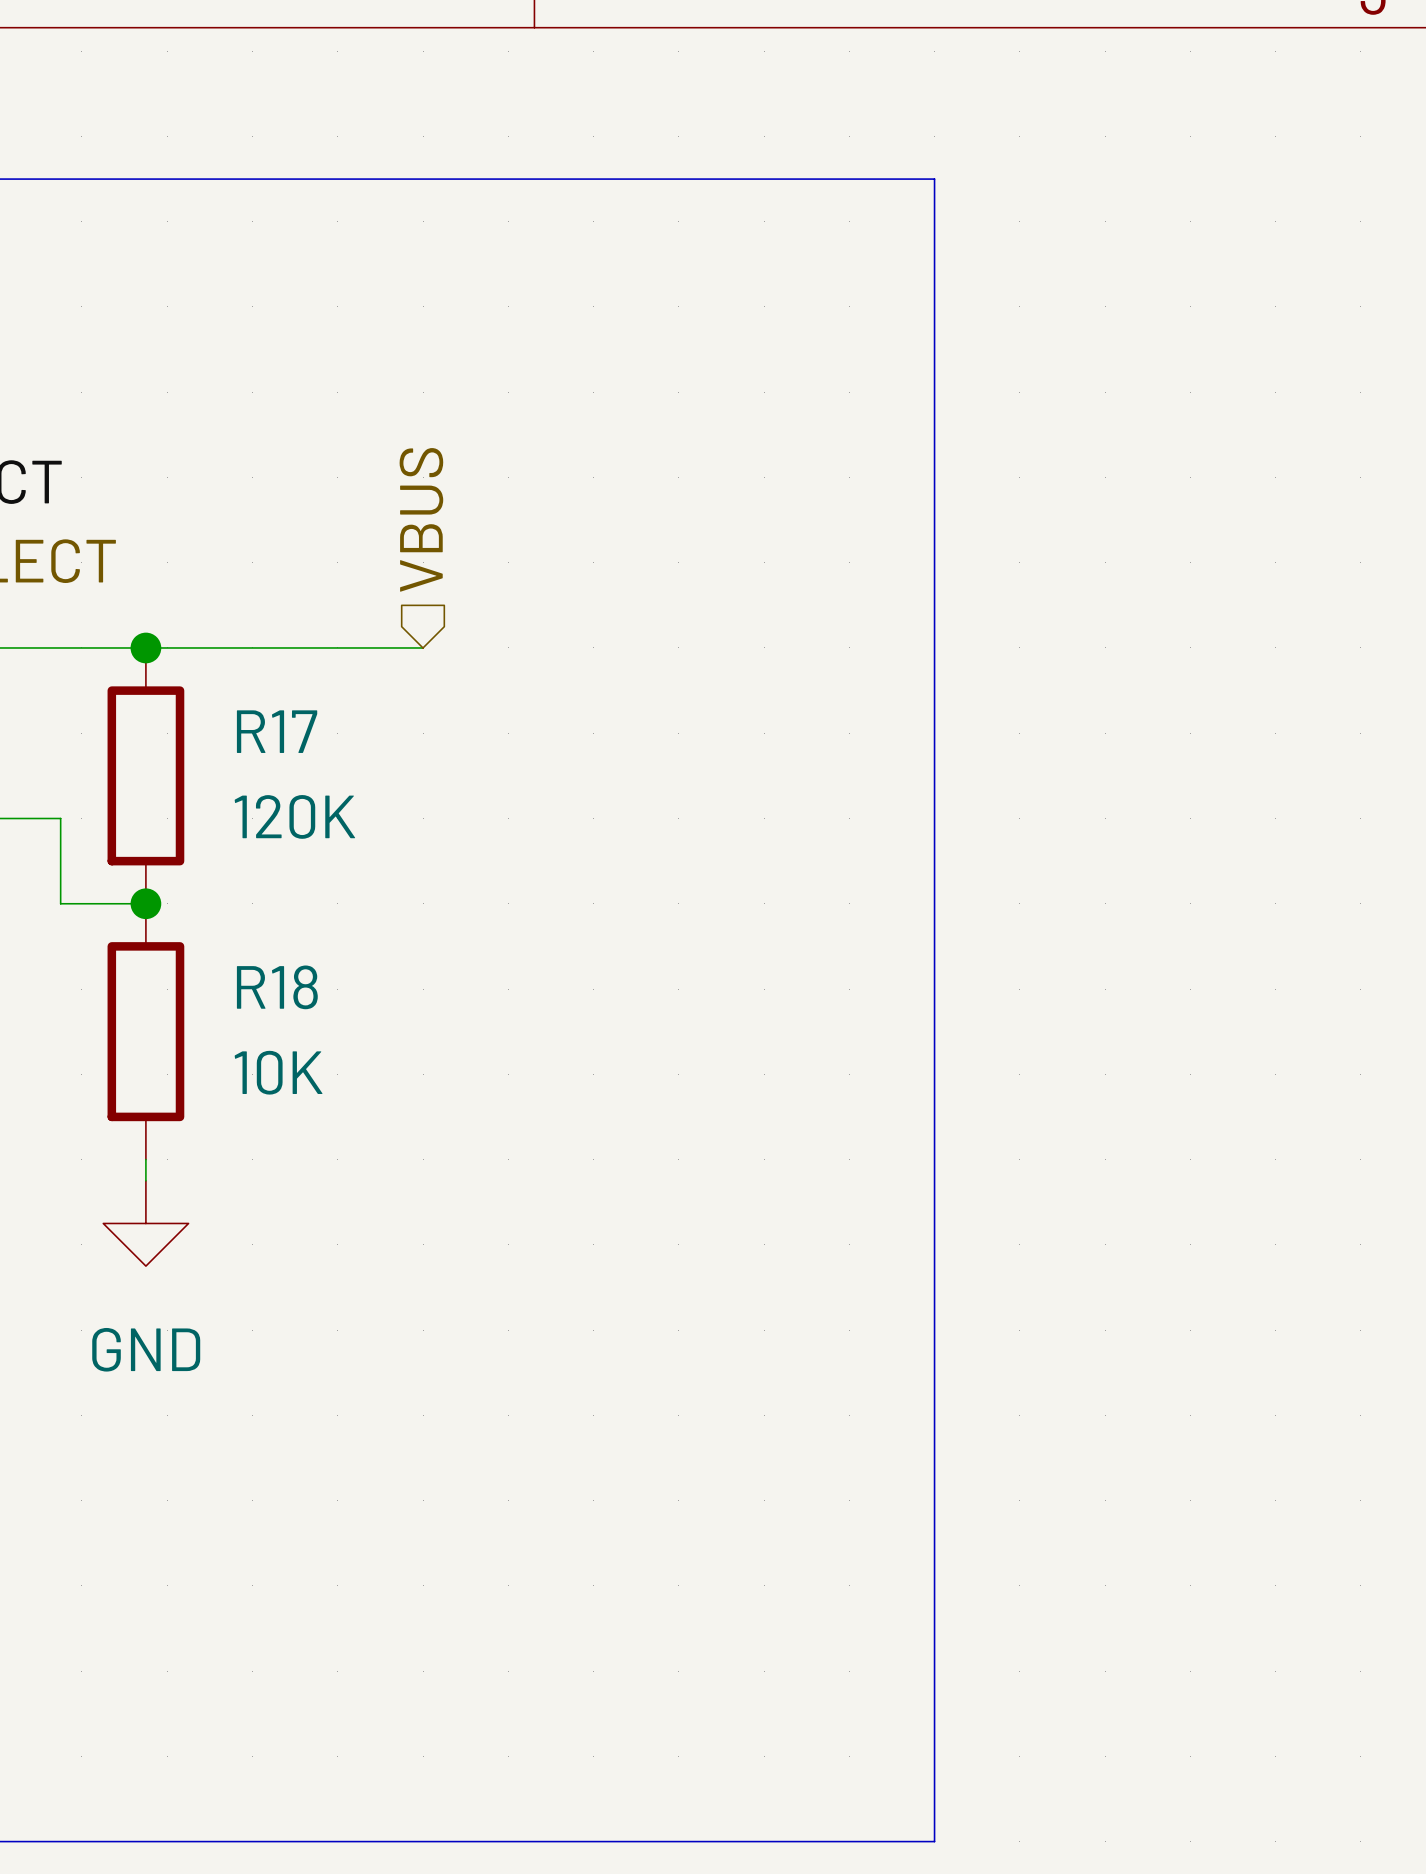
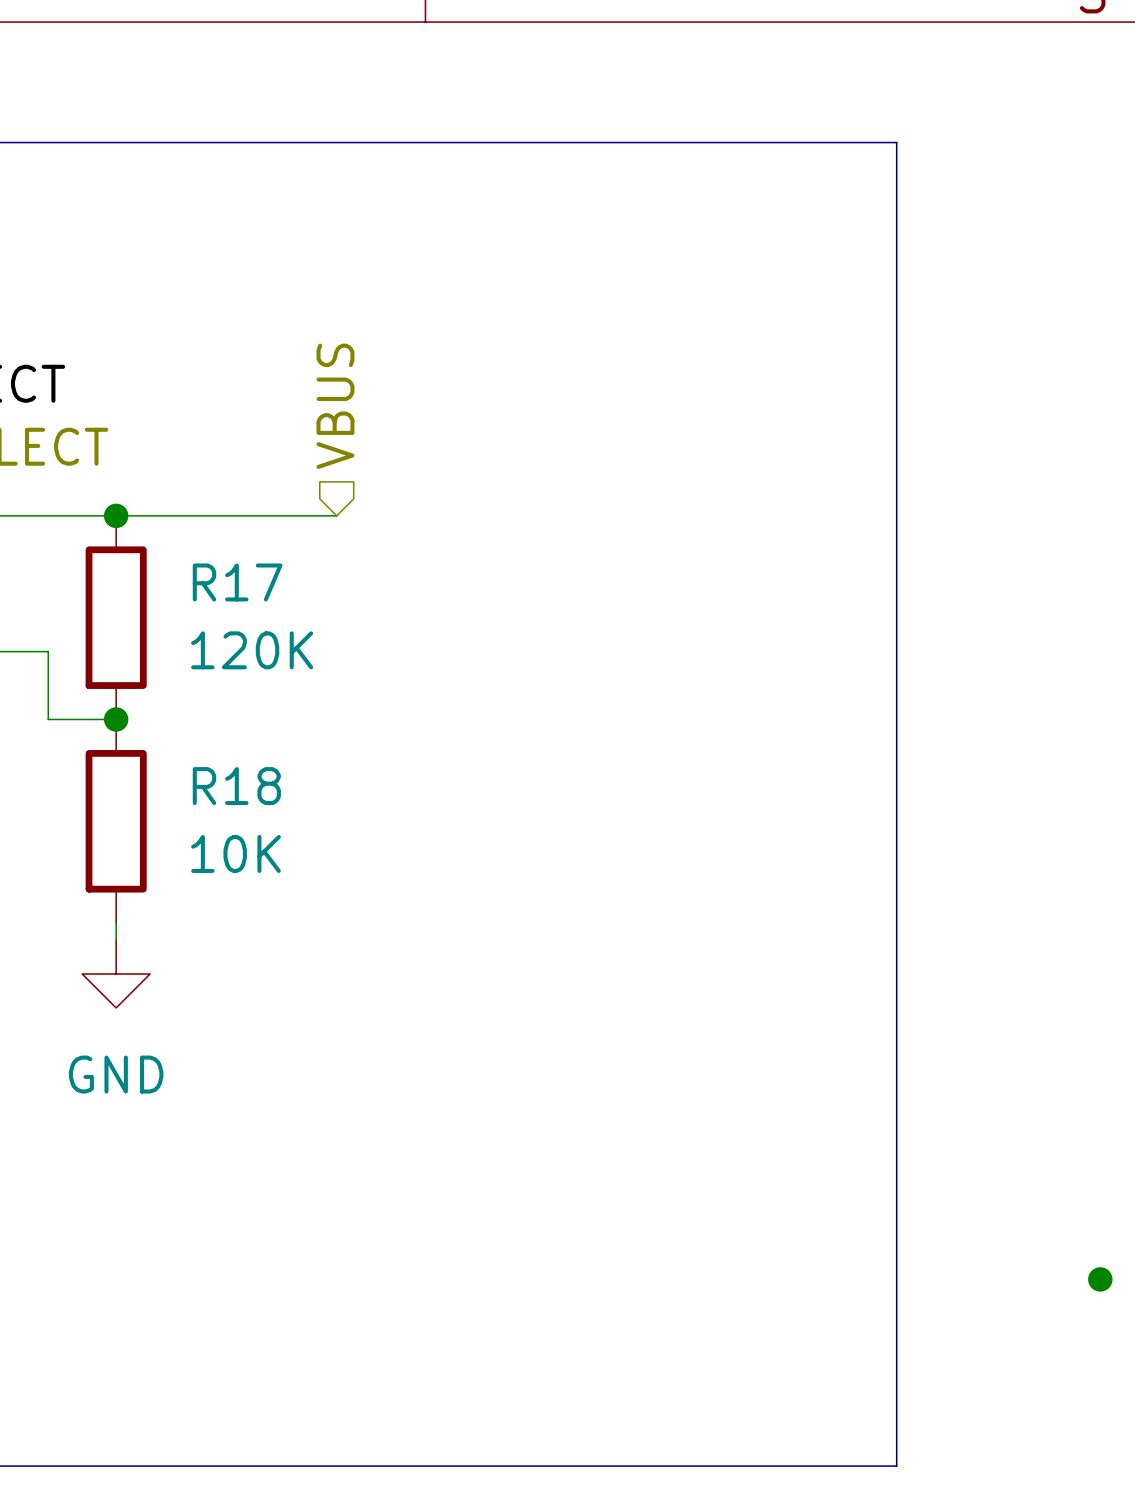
line: (934, 179) (934, 1841) -> (743, 142) (896, 142) (896, 1466) (743, 1466)
junction: none -> (1100, 1279)

